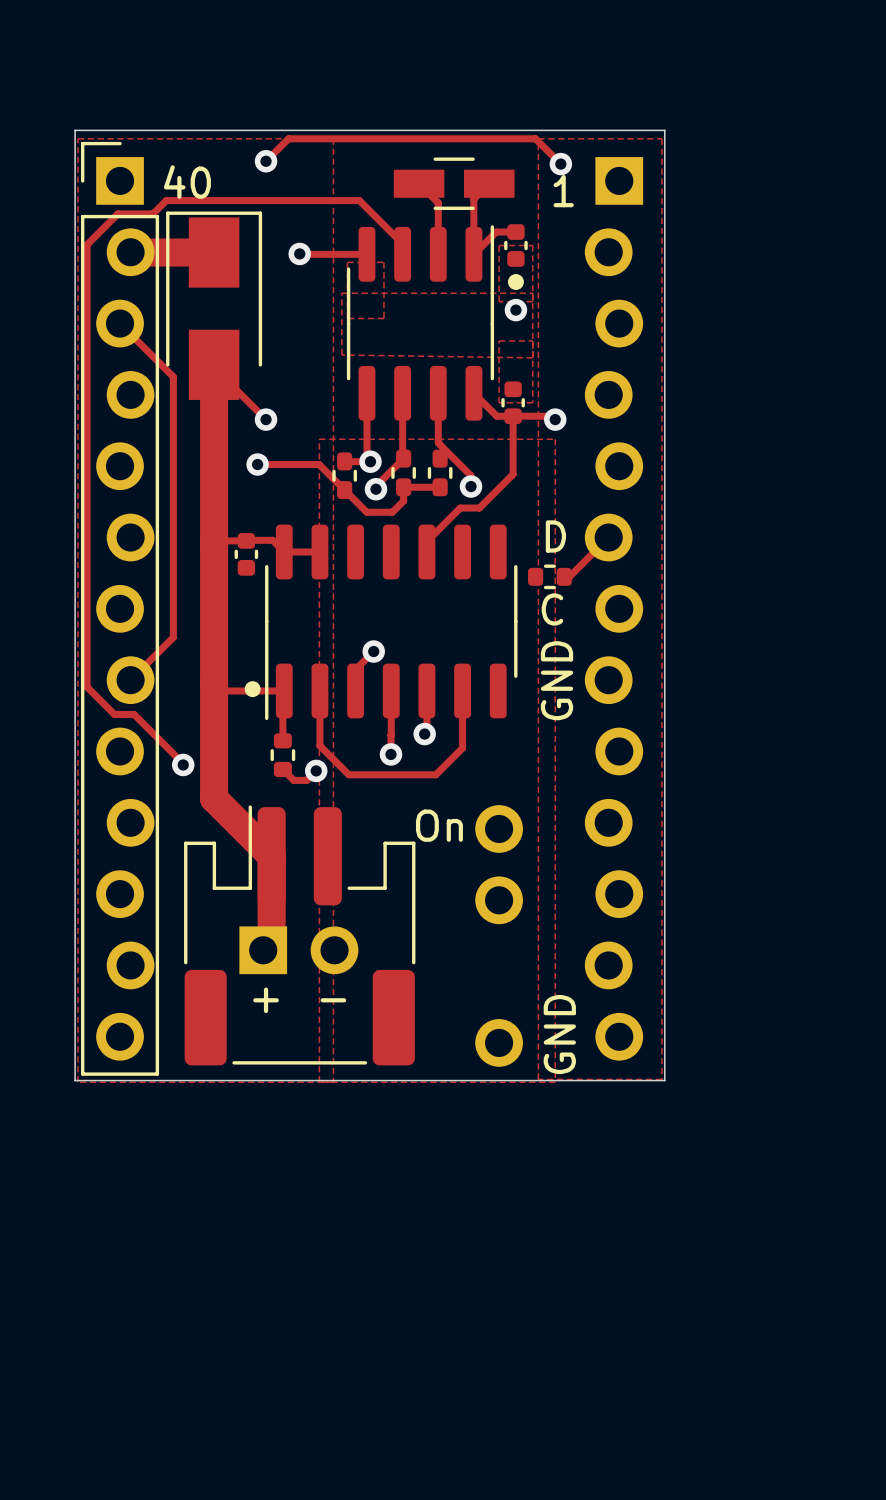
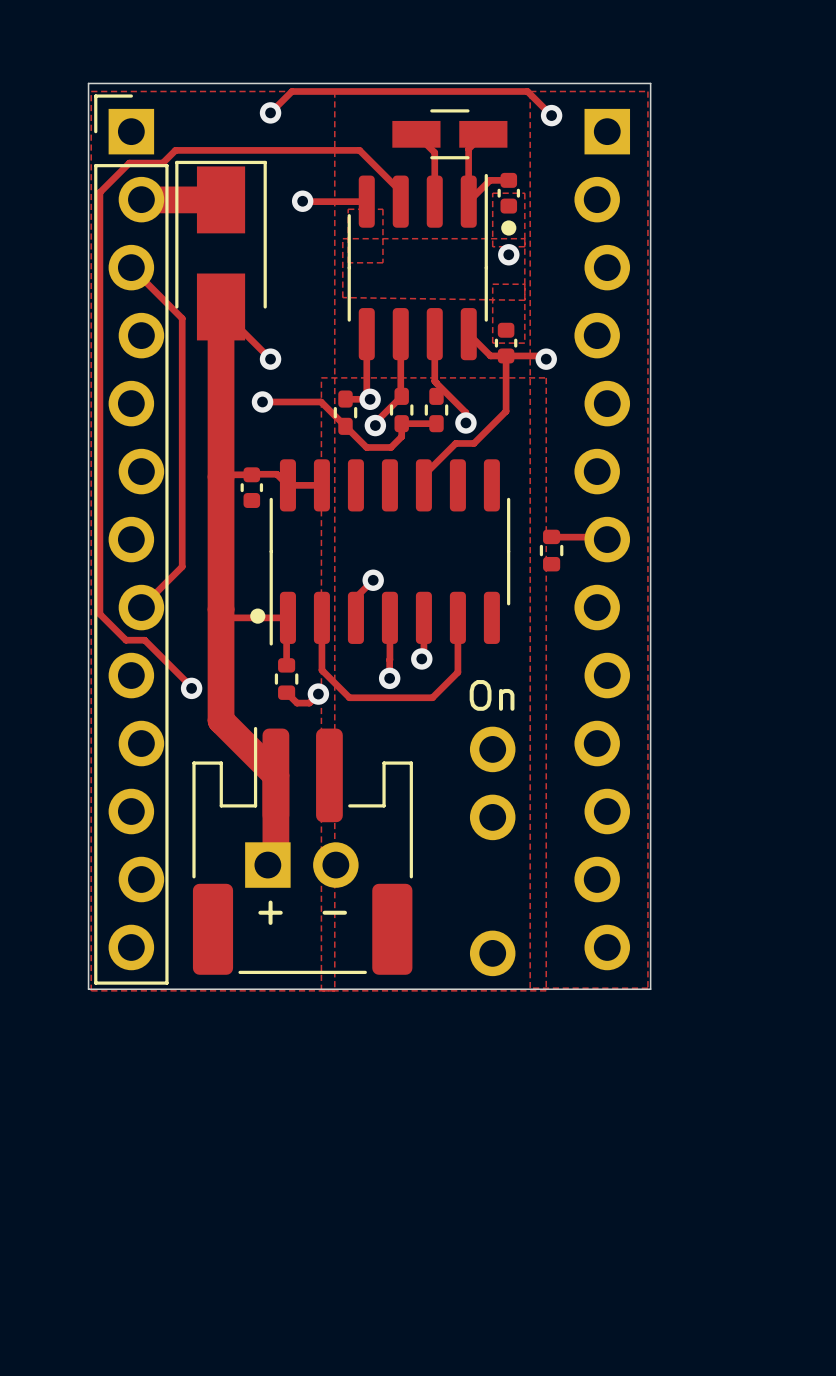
text: 40 (187, 182) -> none
text: 1 (563, 191) -> none
text: D (555, 536) -> none
track: (608, 537) (569, 576) (564, 576) -> none
part rotation: 0° (549, 576) -> 90° clockwise (551, 550)
part position: (549, 576) -> (551, 550)
track: none -> (551, 537) (604, 537) (607, 539)
text: C (552, 609) -> none
text: GND (557, 680) -> none
text position: On (439, 825) -> On (492, 695)
text: GND (559, 1034) -> none

